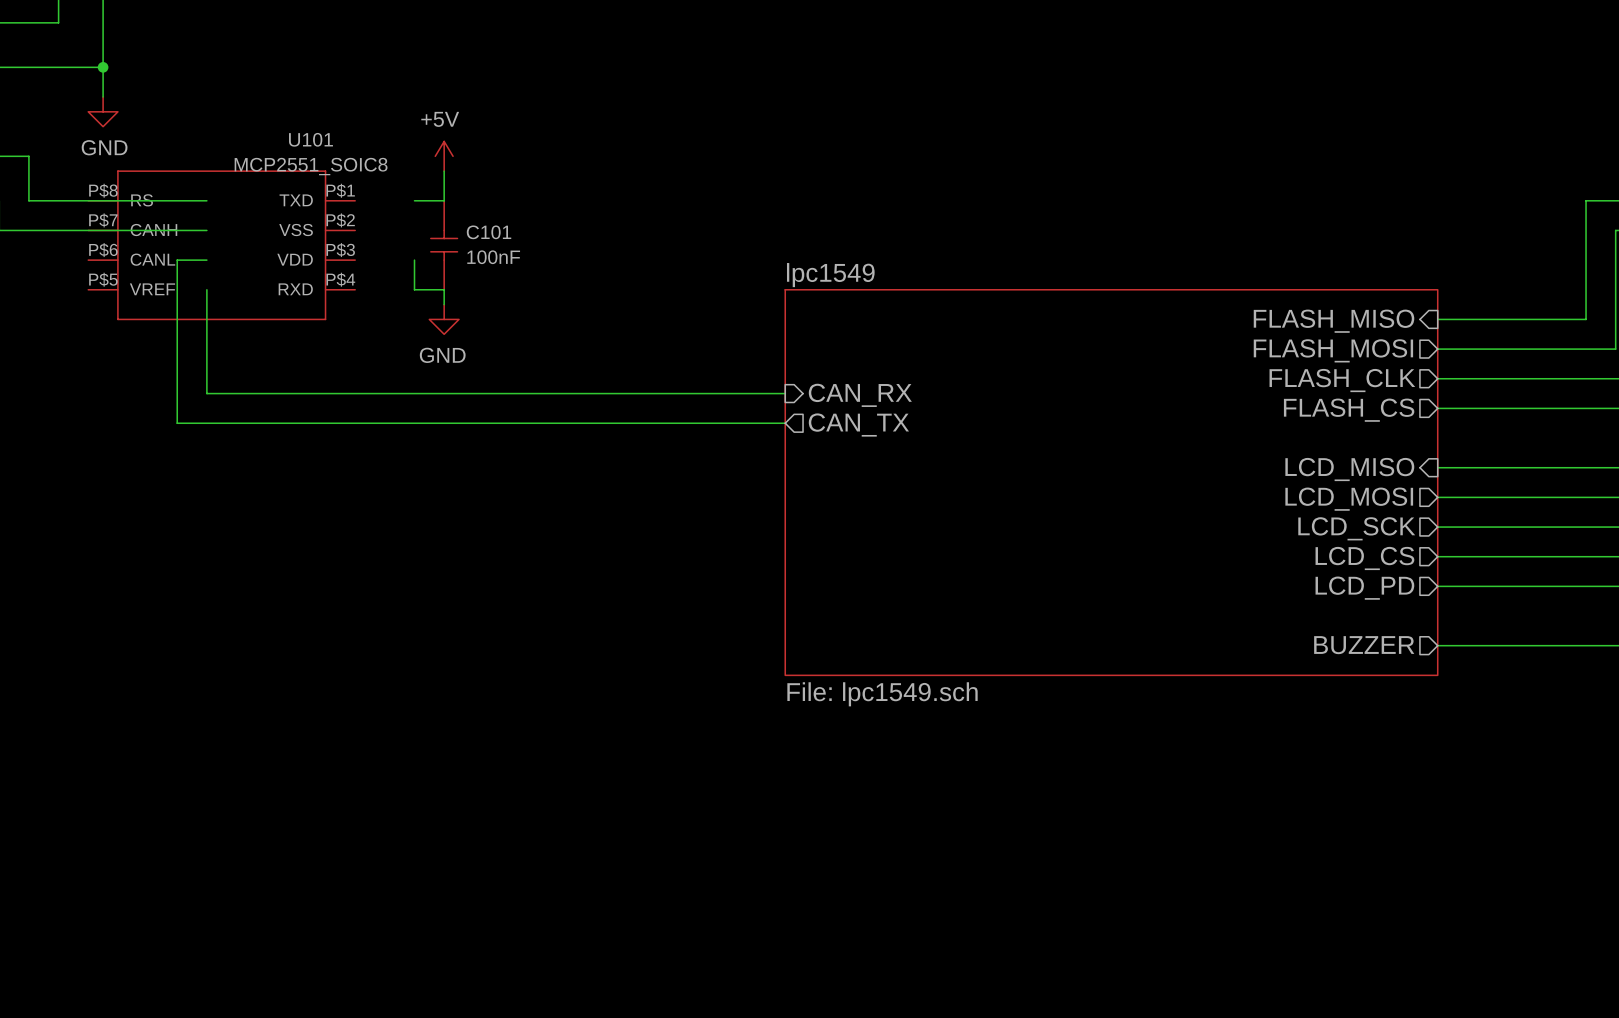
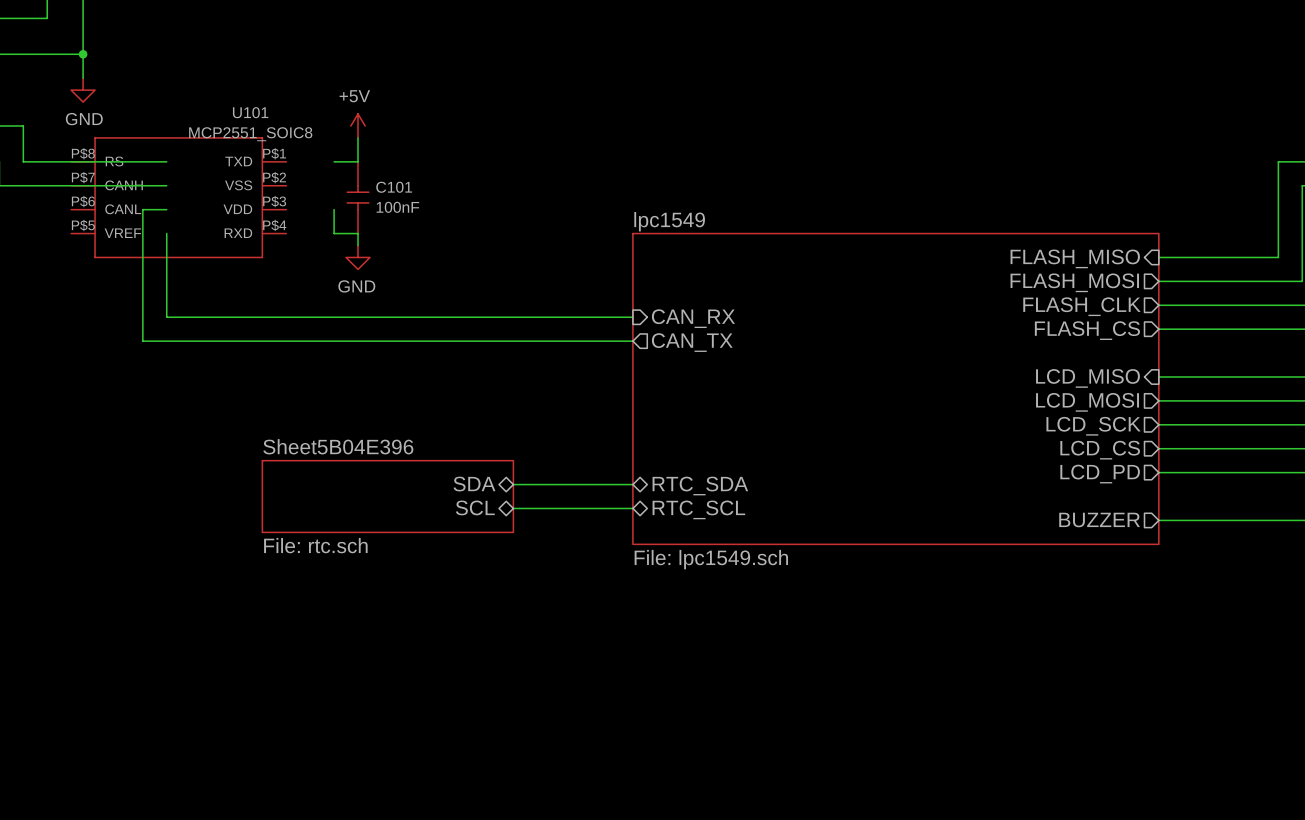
sheet pin: none -> SDA (474, 484)
wire: none -> (513, 484) (632, 484)
sheet pin: none -> RTC_SDA (700, 486)
sheet Sheet5B04E396: none -> File: rtc.sch (387, 496)
sheet pin: none -> SCL (475, 507)
wire: none -> (513, 508) (632, 508)
sheet pin: none -> RTC_SCL (698, 509)

